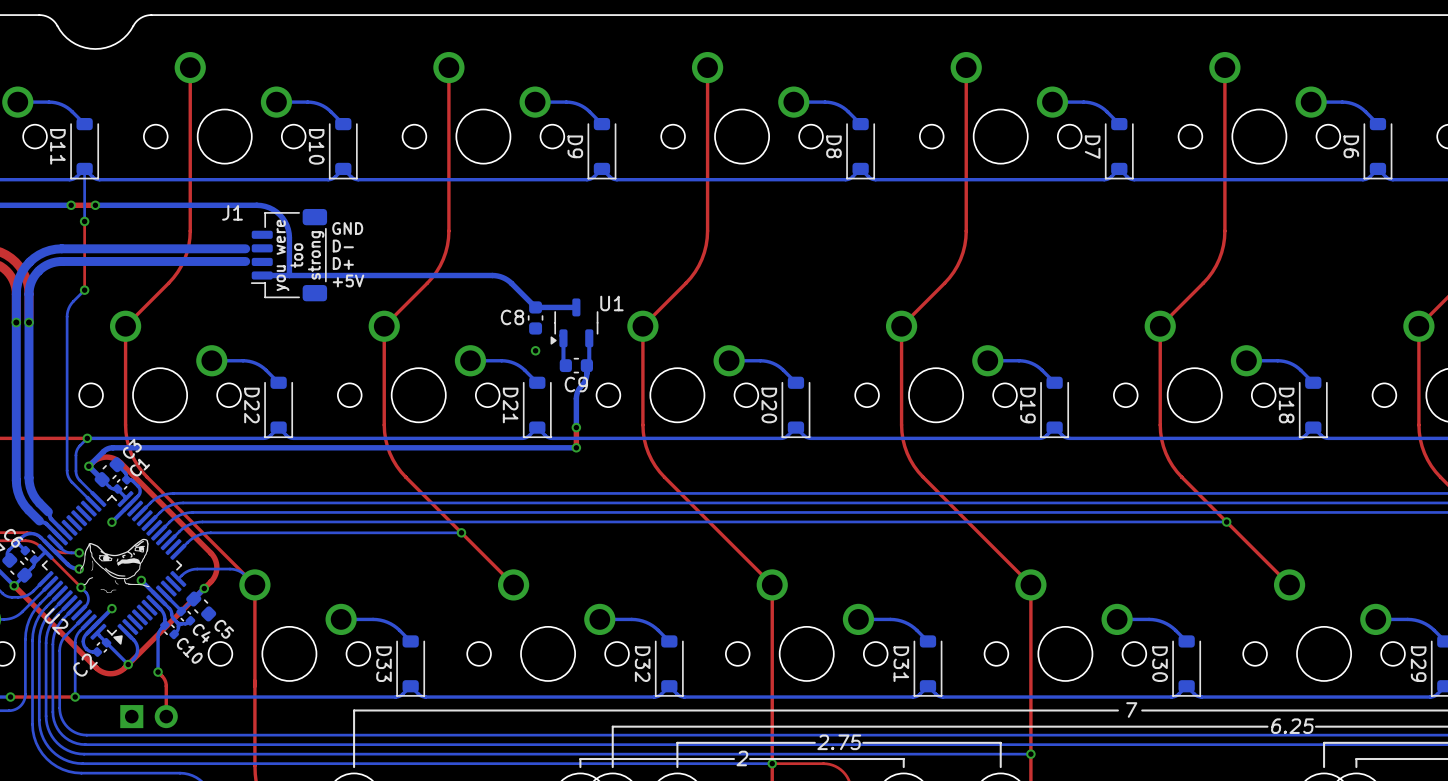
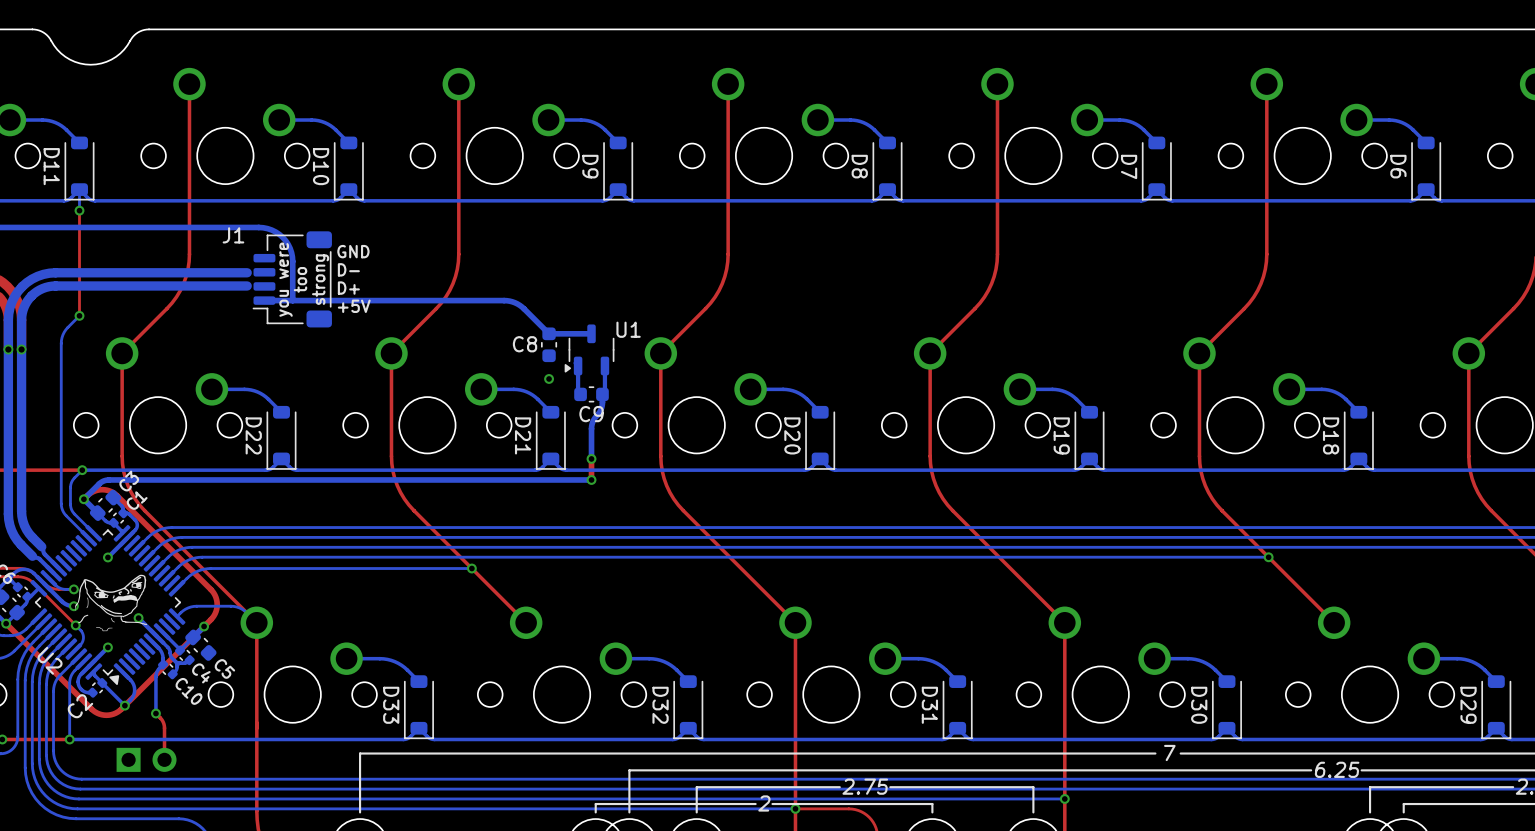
bottom track: (84, 189) (84, 221) -> none
top track: none -> (79, 210) (79, 244)
via: none -> (79, 210)
via: (71, 205) -> none
bottom track: none -> (90, 227) (65, 227)
top track: (95, 205) (71, 205) -> none
via: (95, 205) -> none
via: (84, 221) -> none

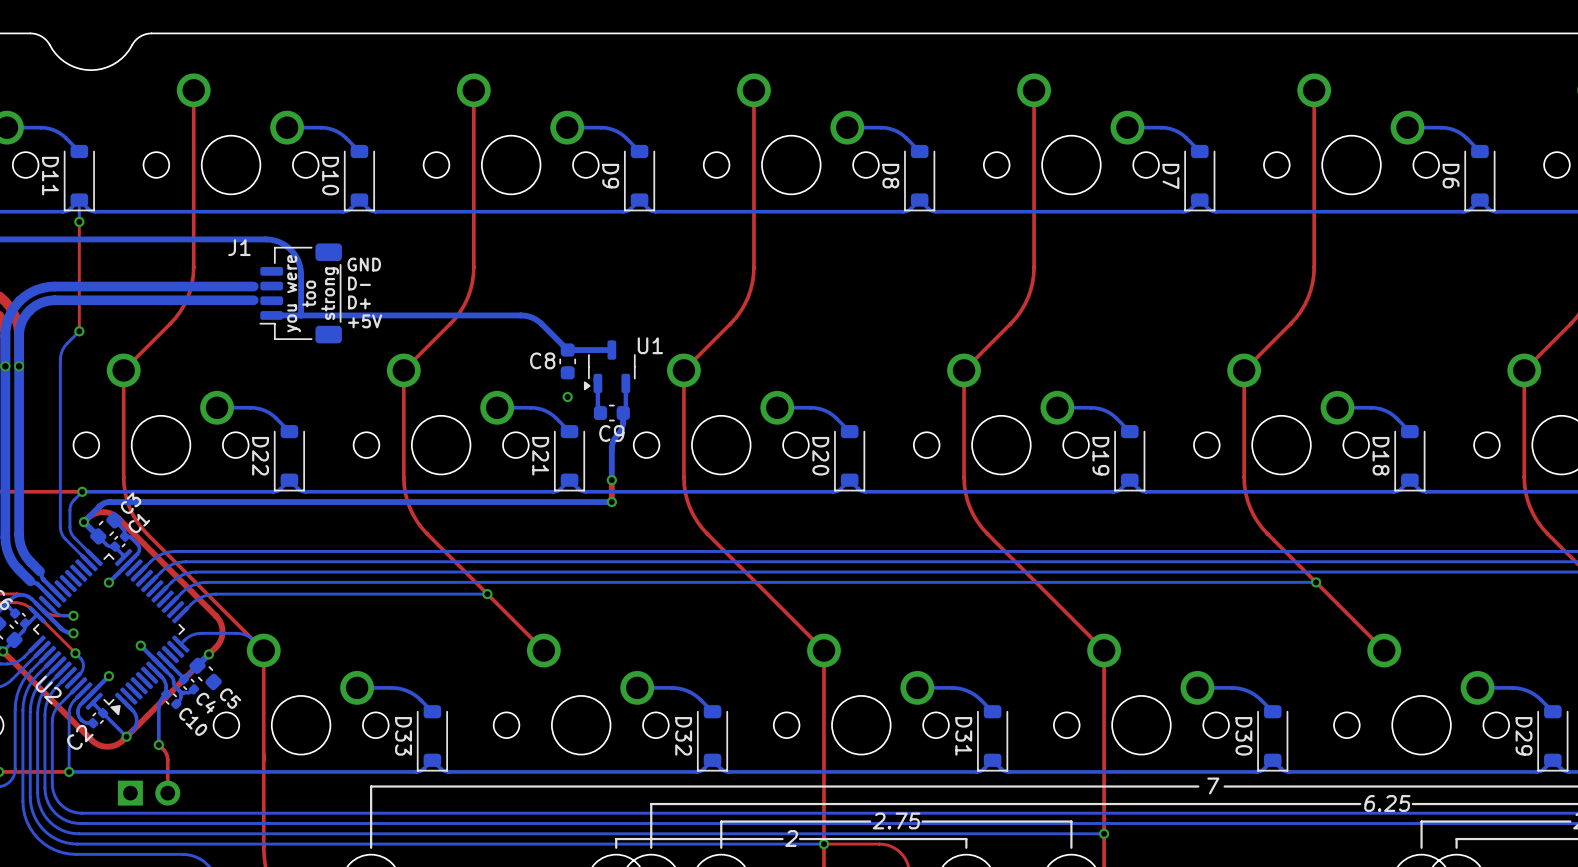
drawing: [75, 574, 147, 632] -> none

